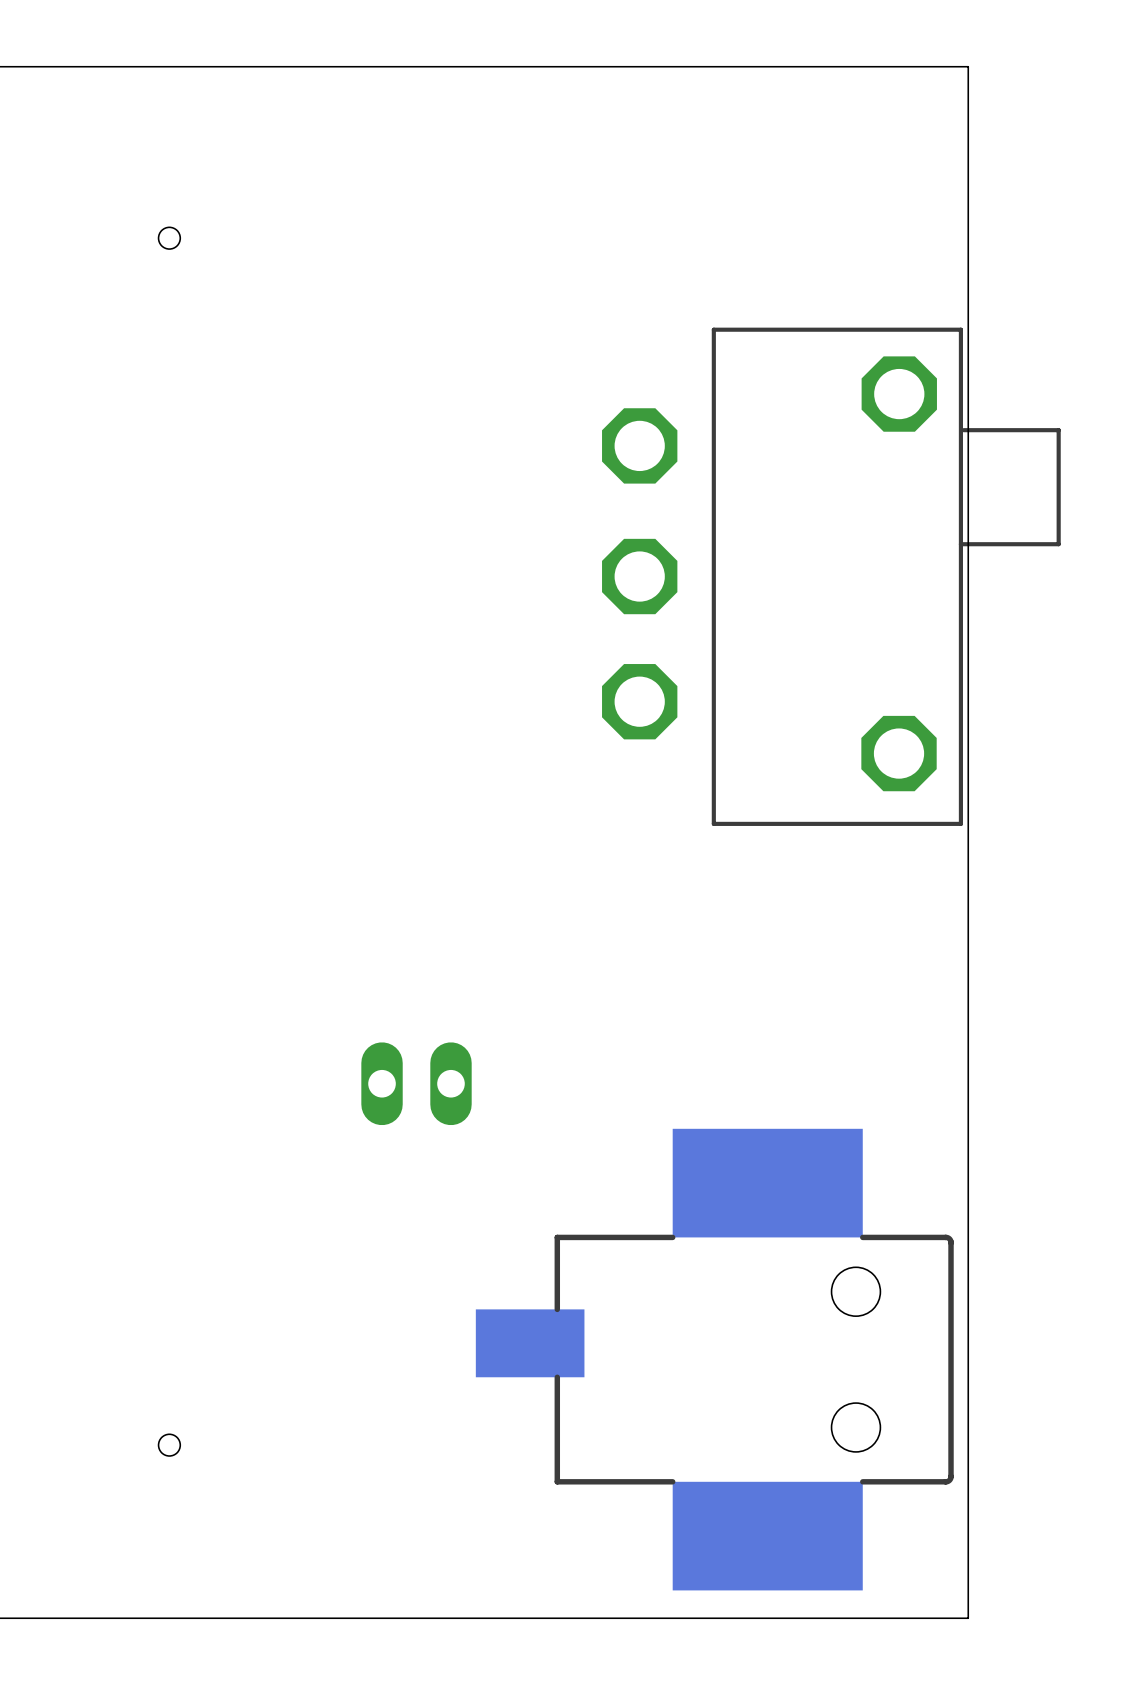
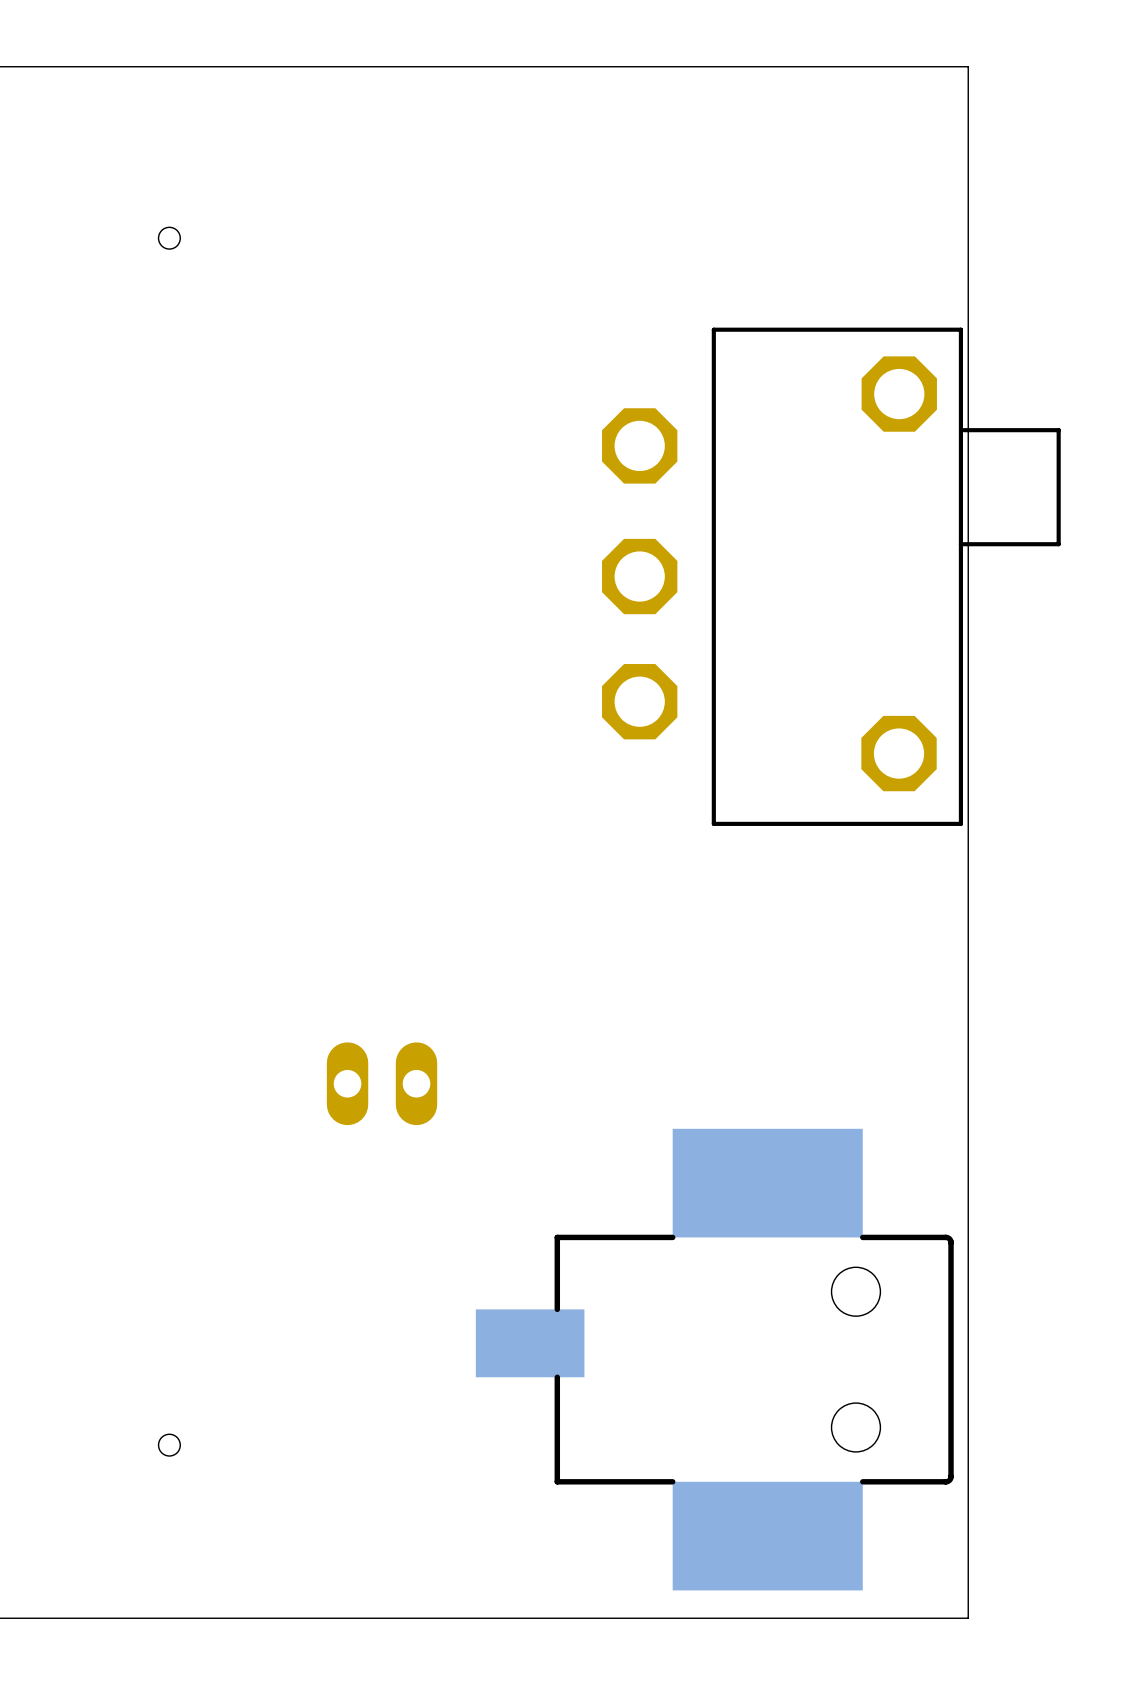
part position: (416, 1083) -> (382, 1083)

